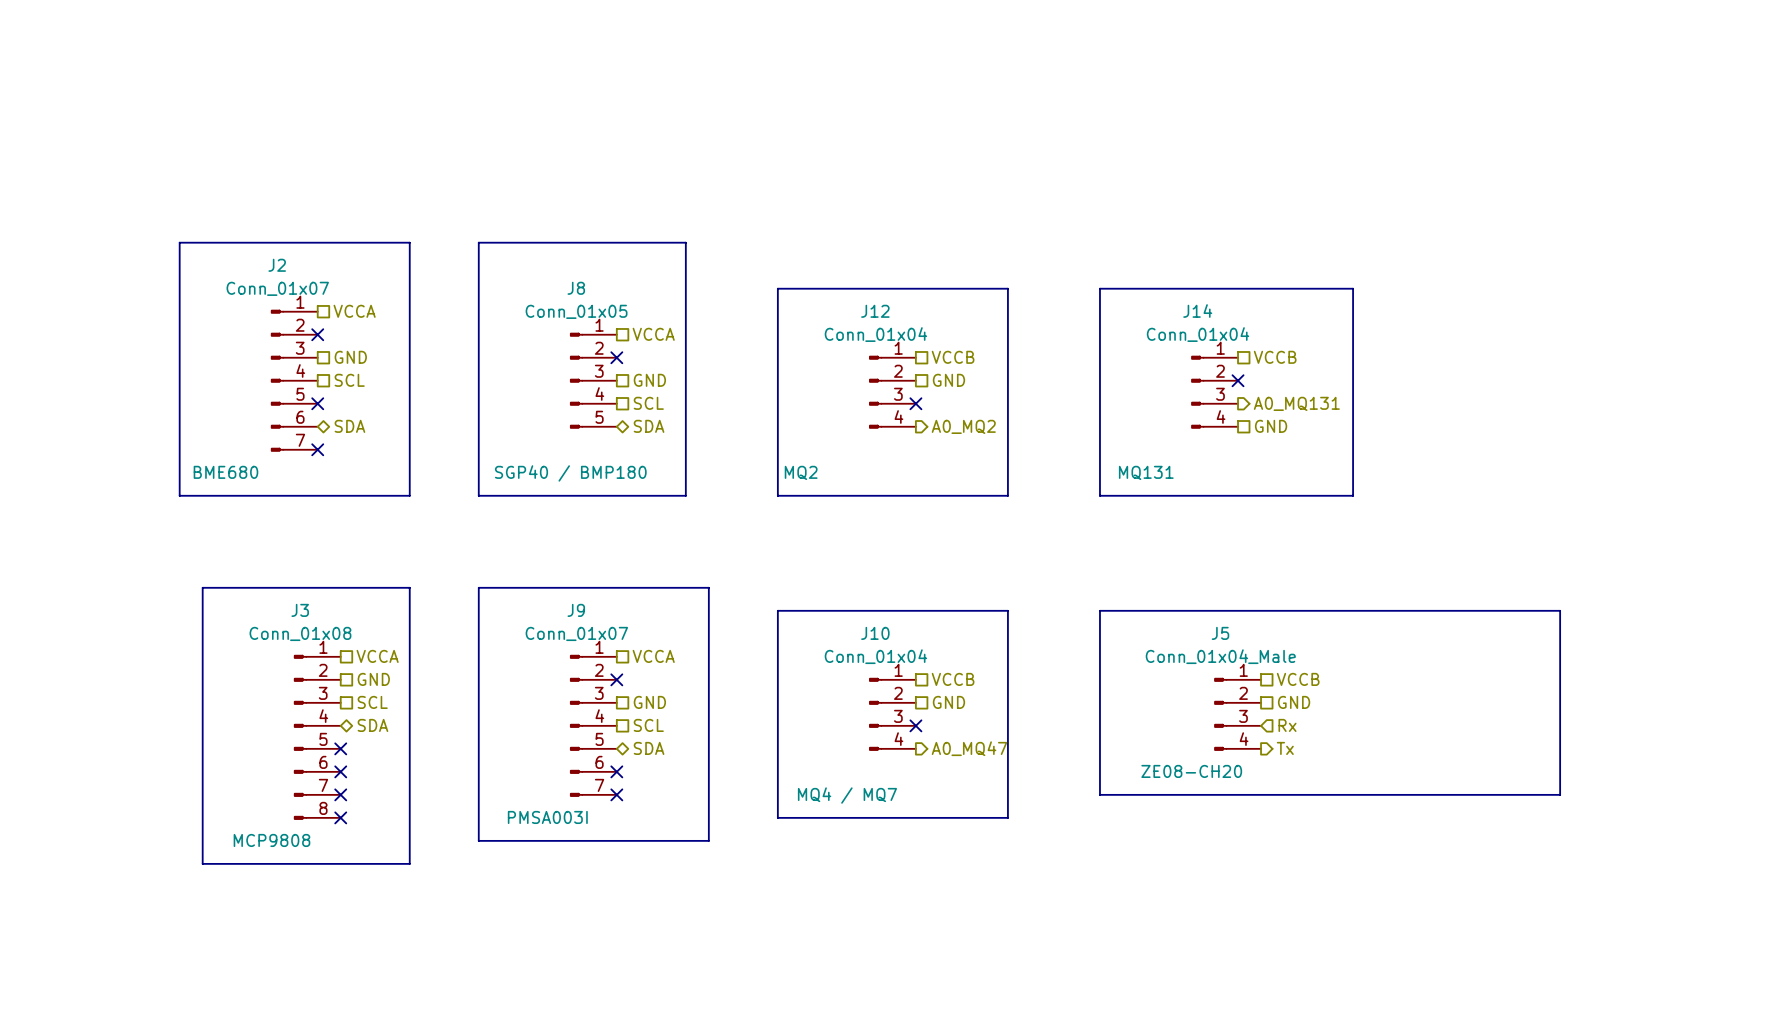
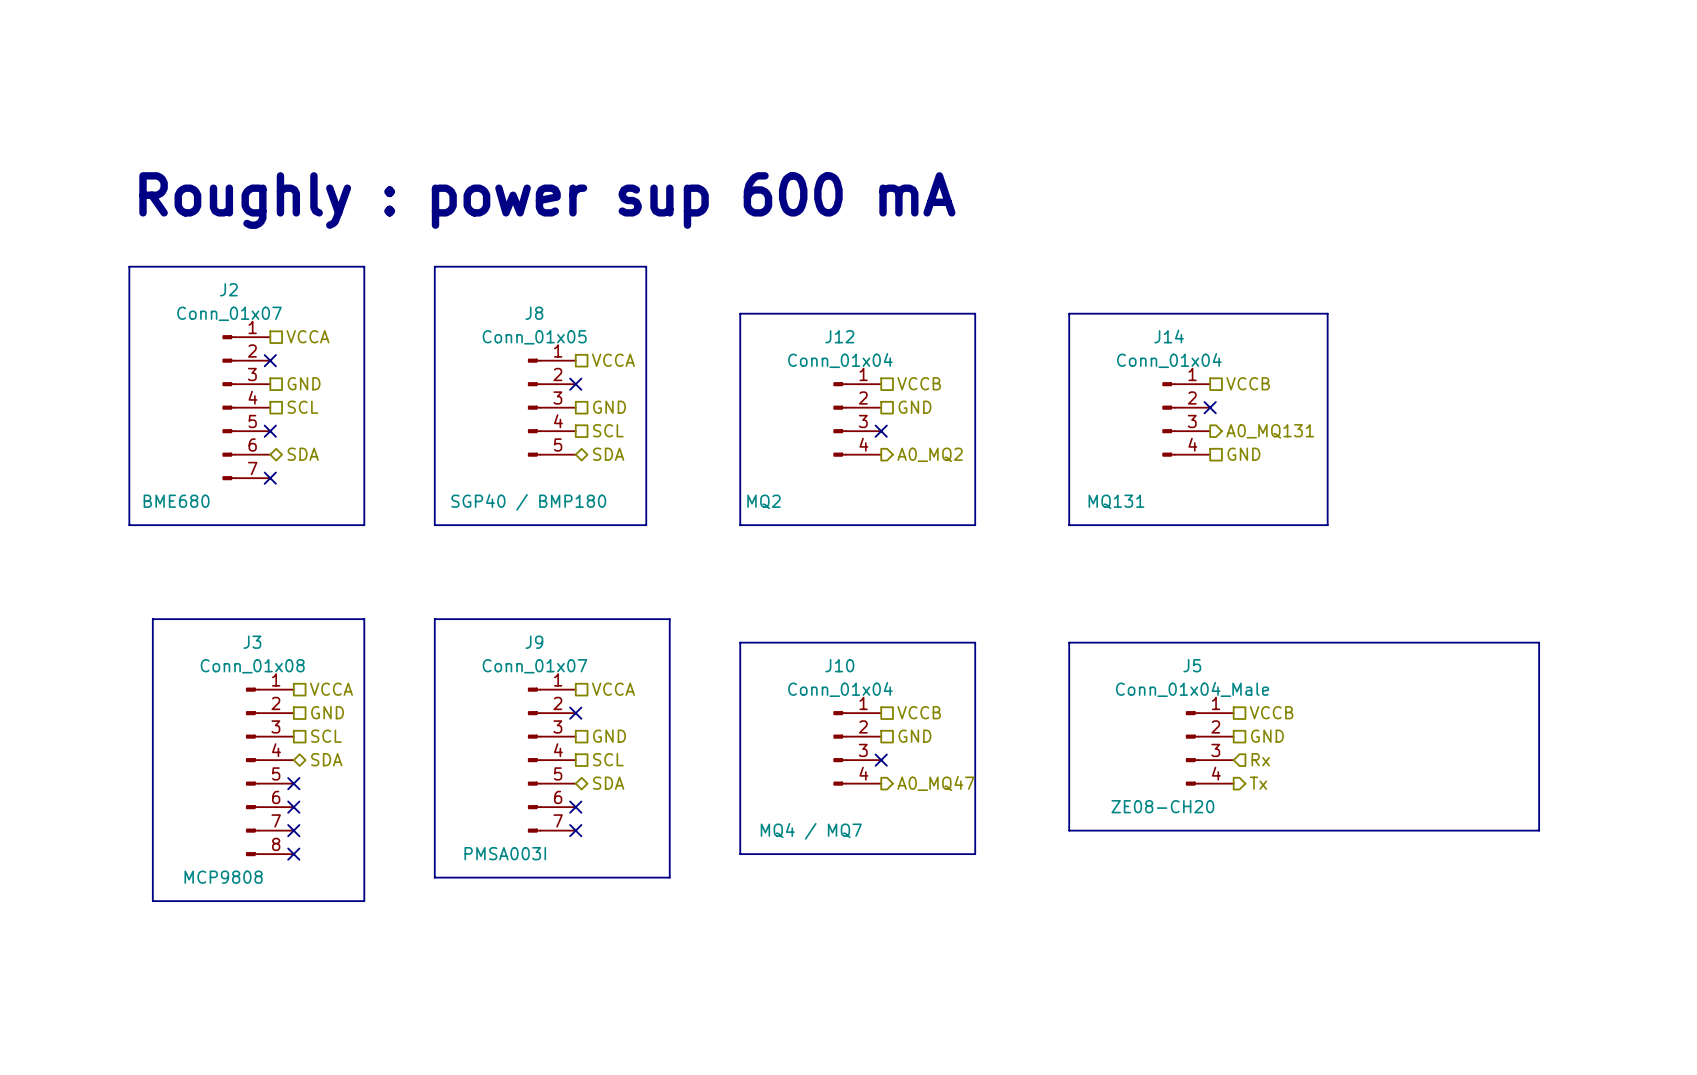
text: none -> Roughly : power sup 600 mA (547, 200)

